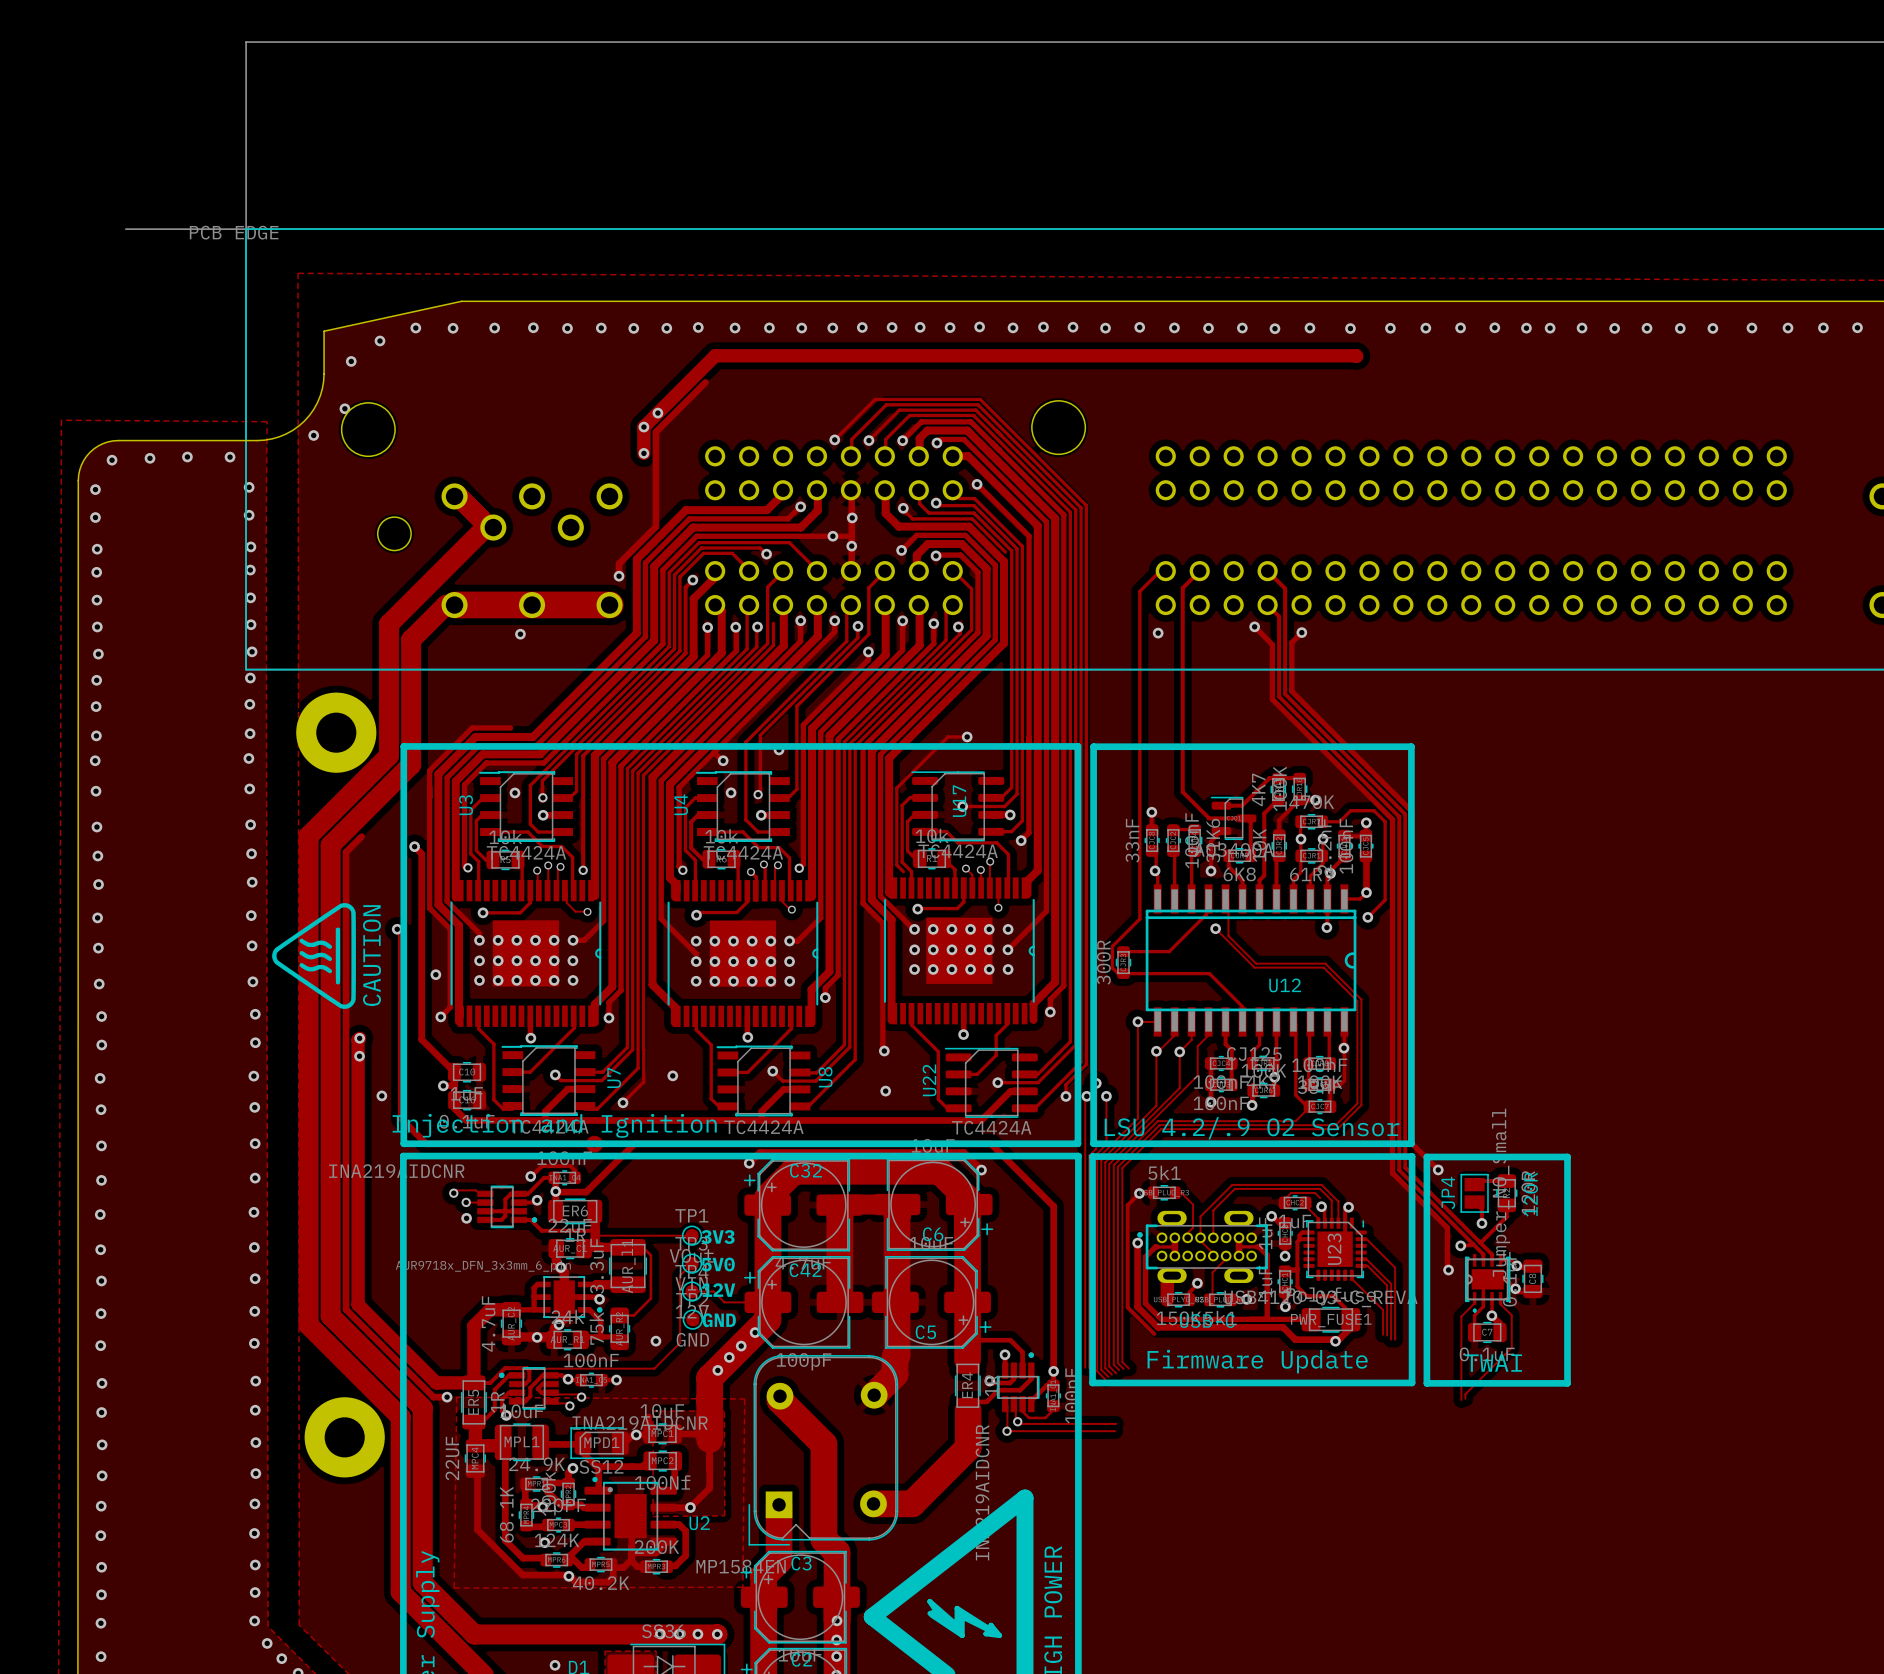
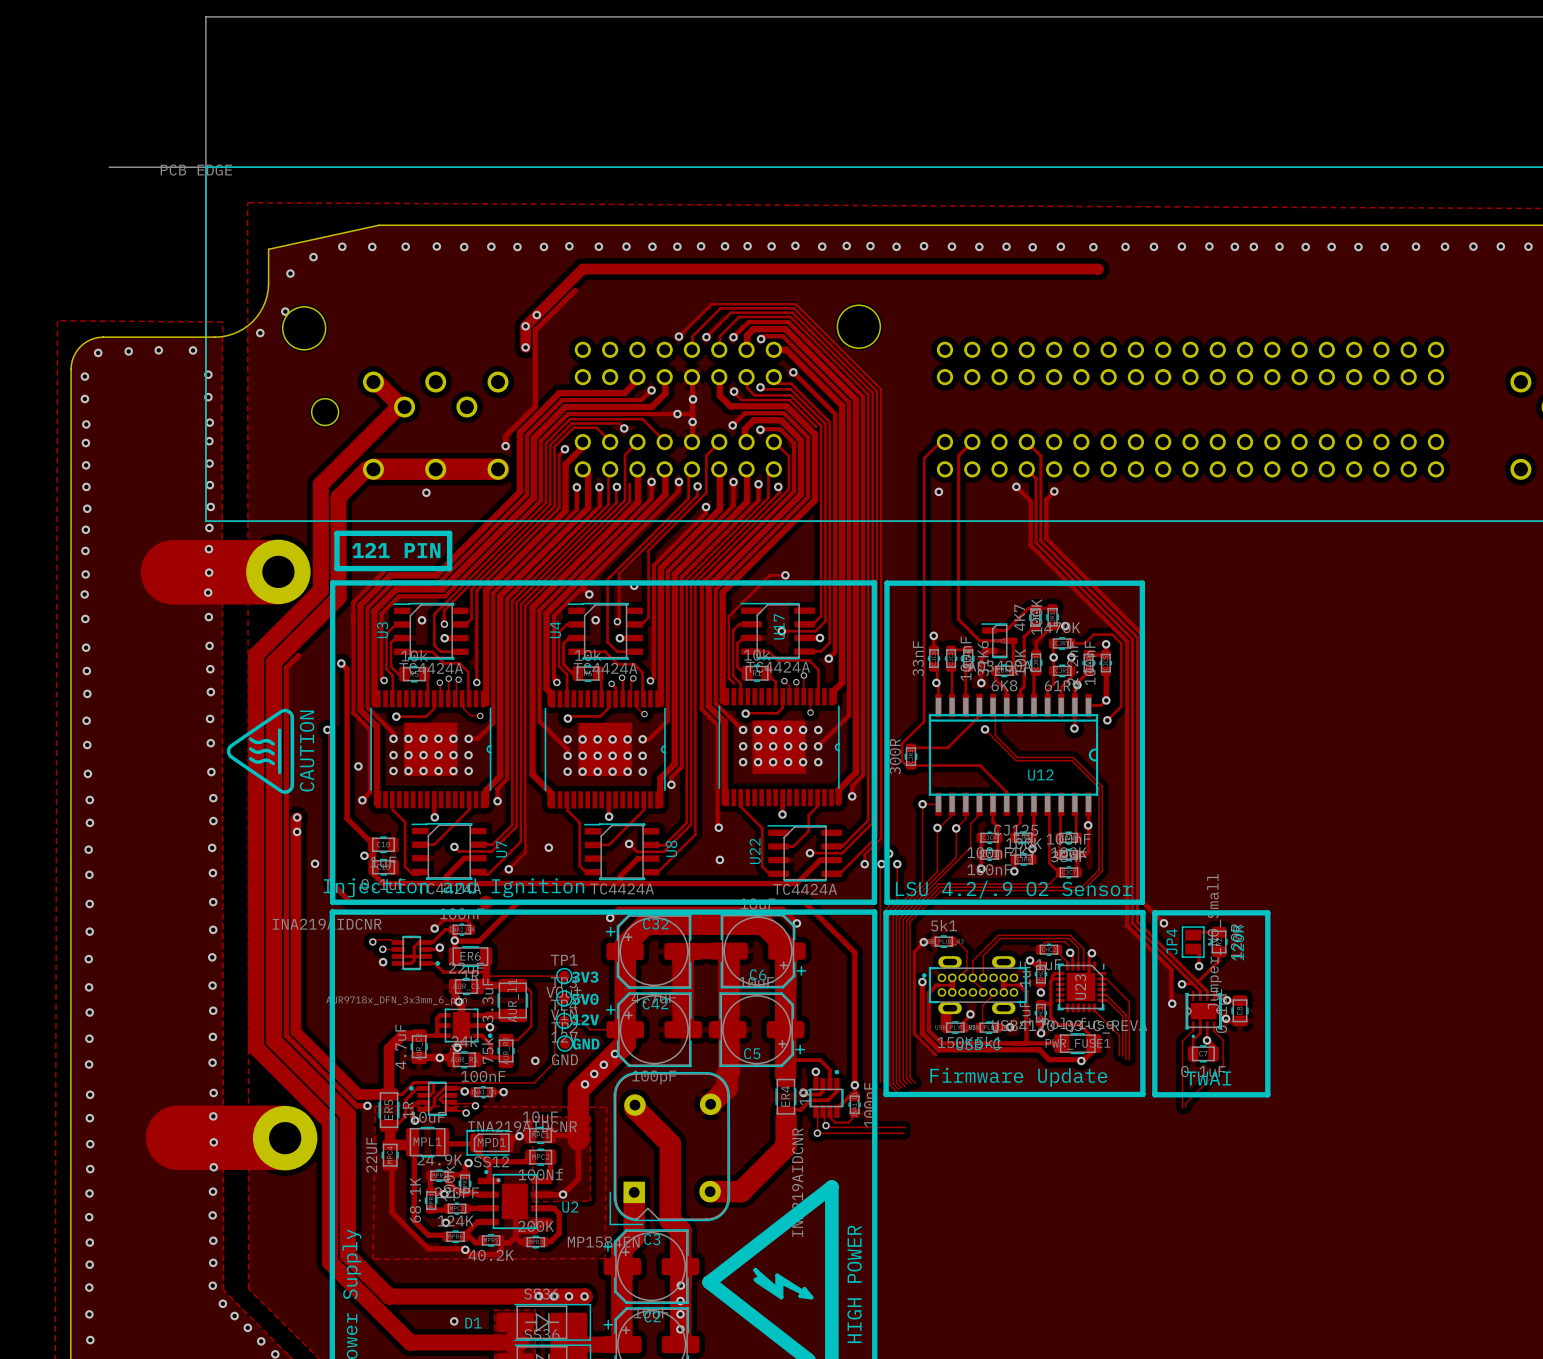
line: none -> (336, 533) (449, 533) (449, 568) (336, 568) (336, 533)
text: none -> 121 PIN (396, 550)
track: none -> (172, 572) (277, 572)
track: none -> (178, 1137) (282, 1137)

